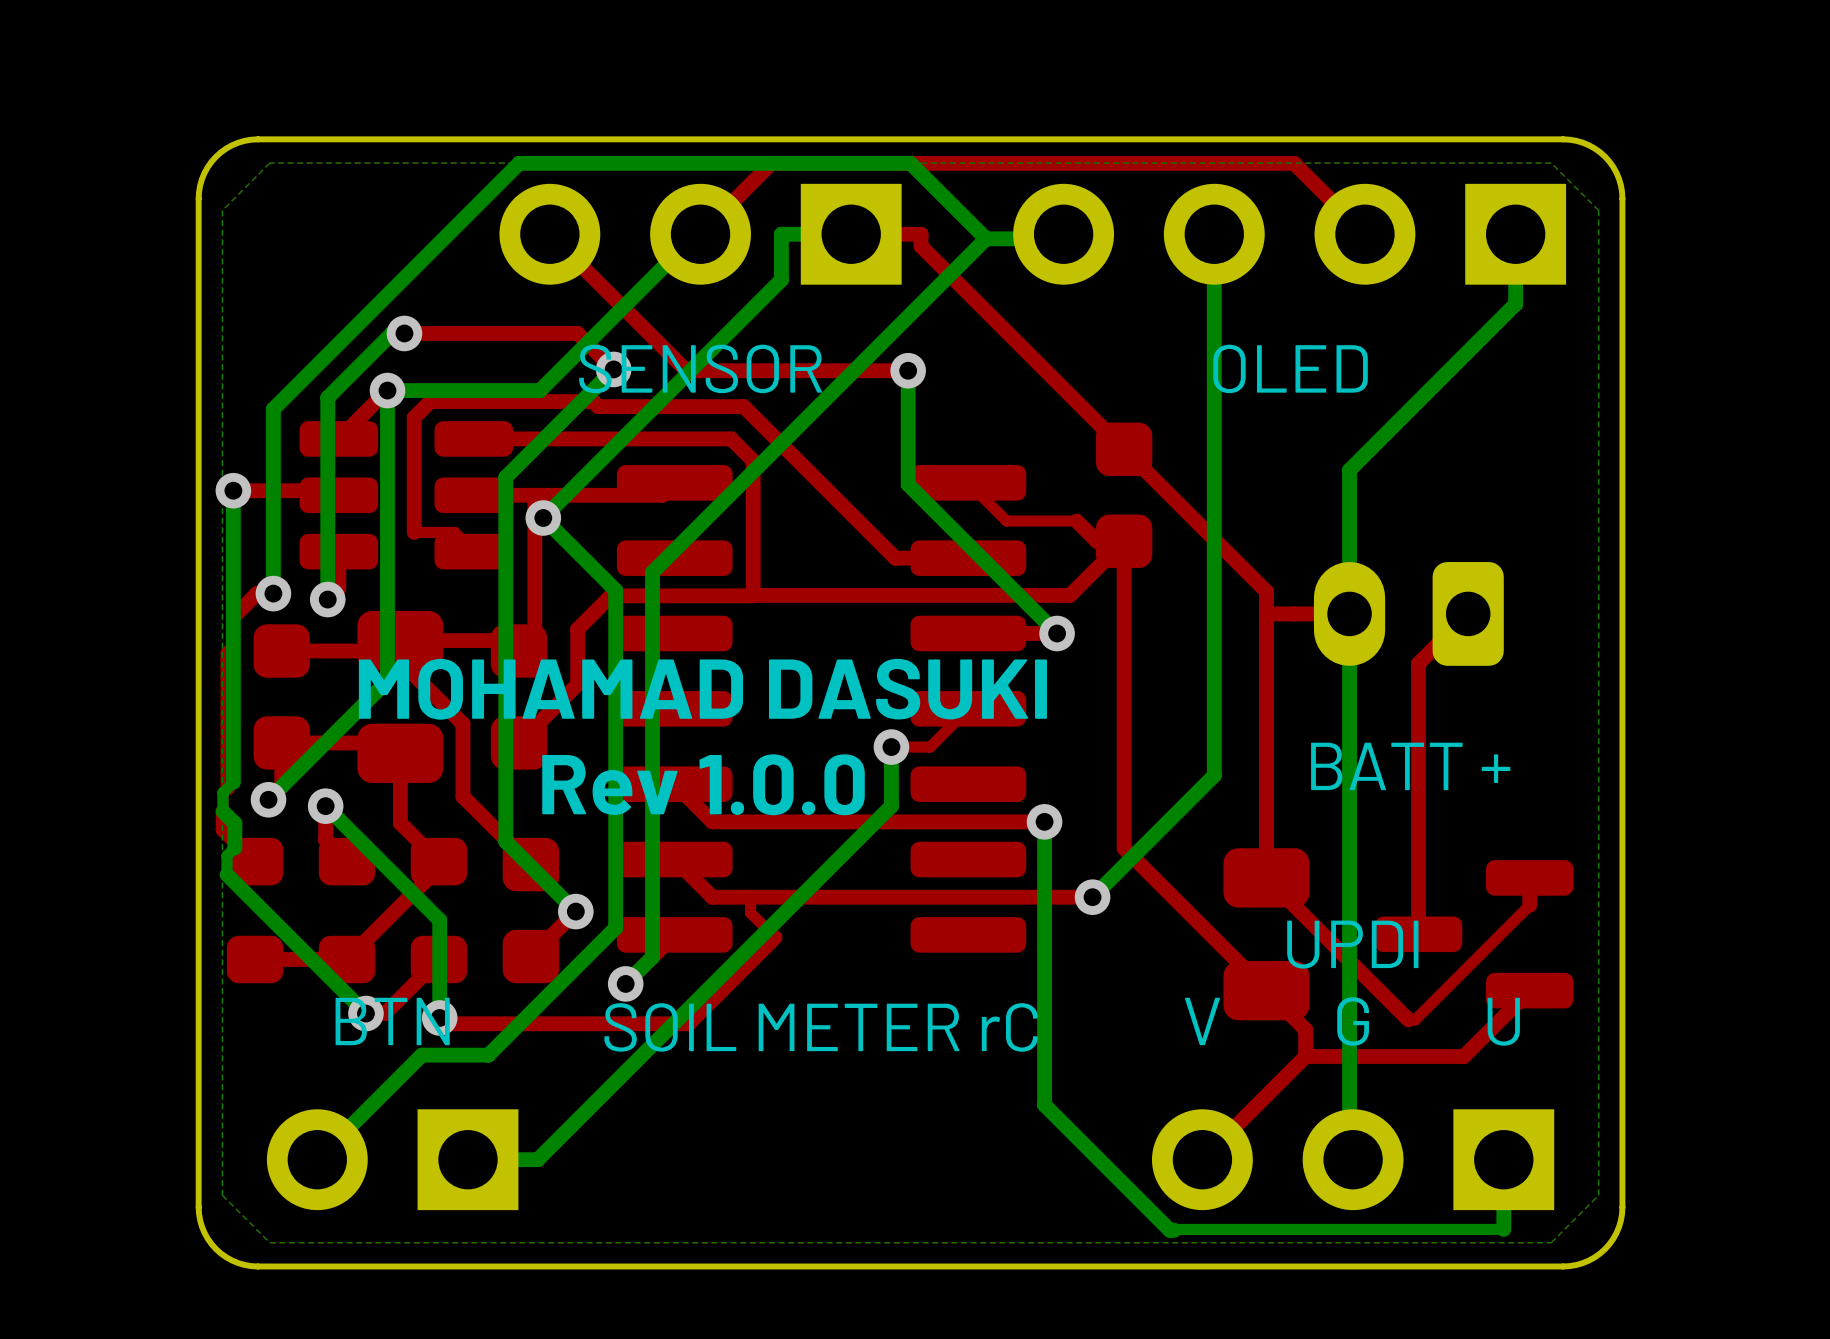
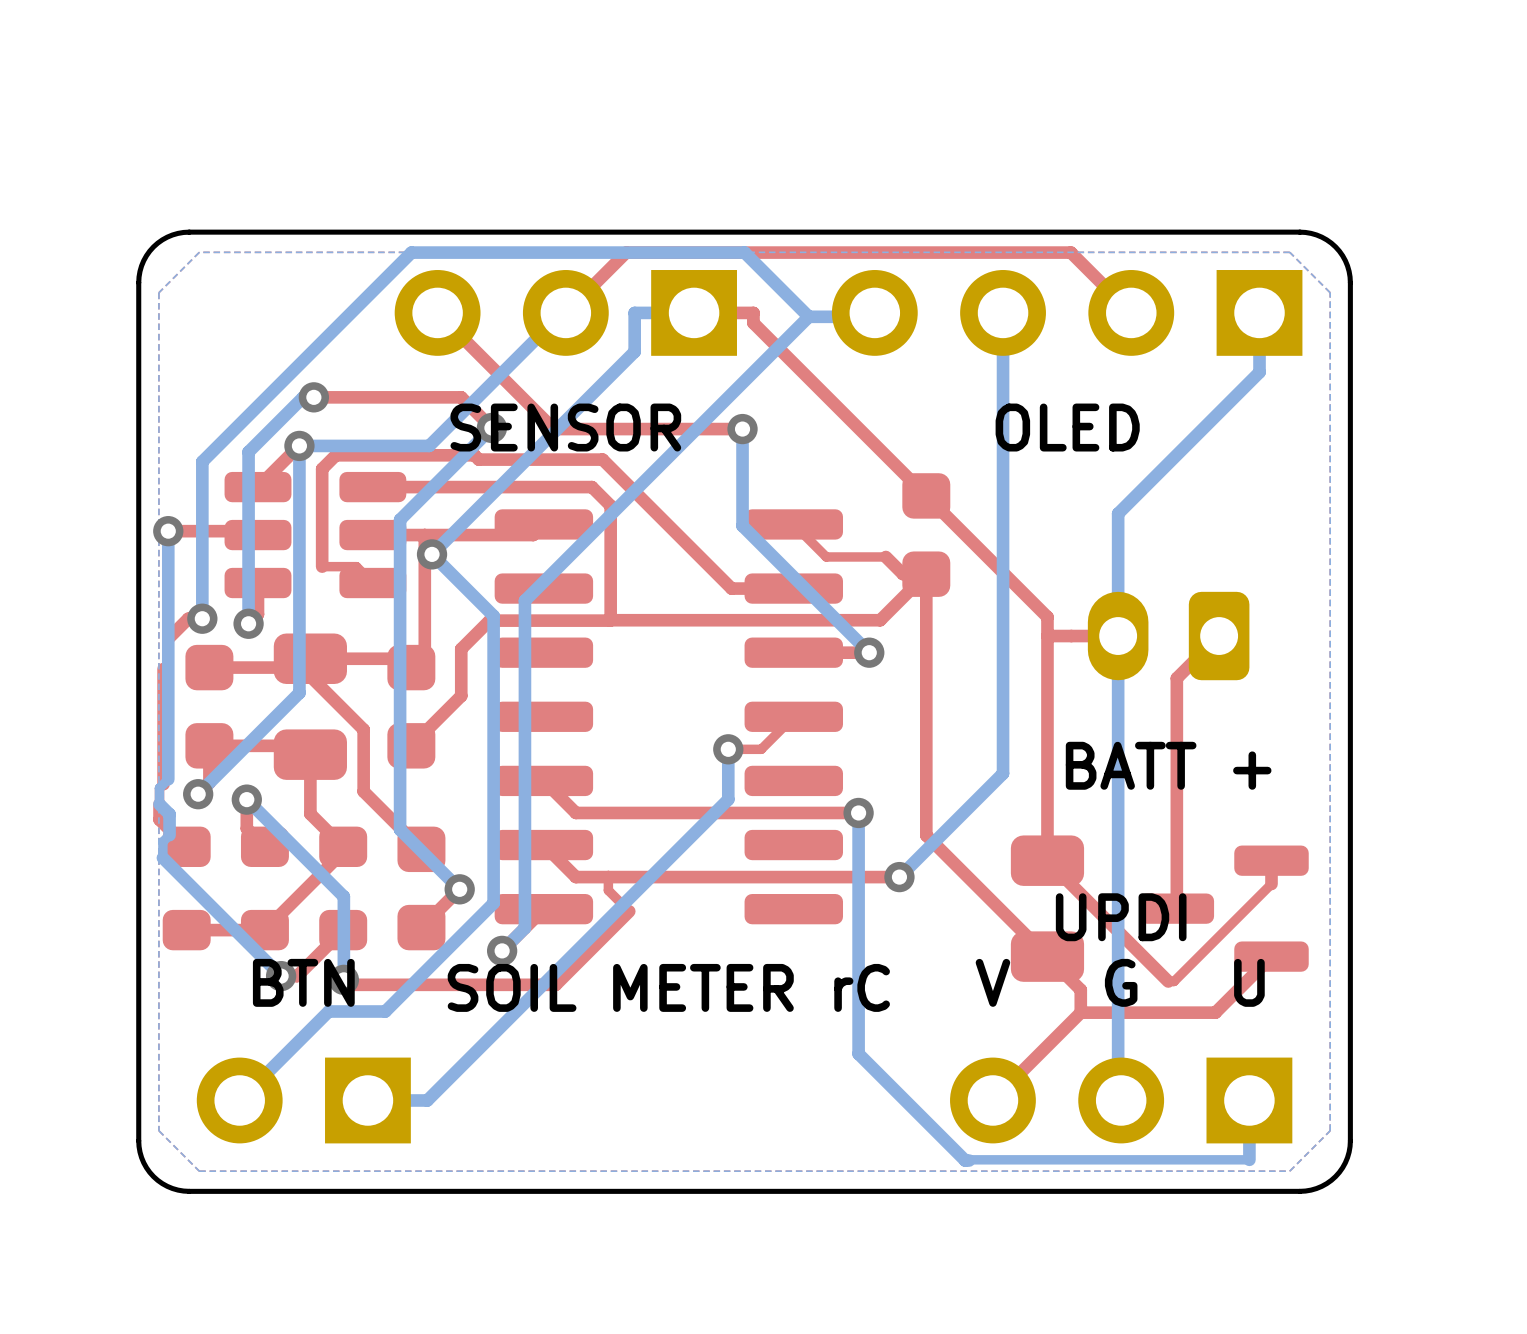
text: MOHAMAD DASUKI (702, 689) -> none
text: Rev 1.0.0 (703, 784) -> none

